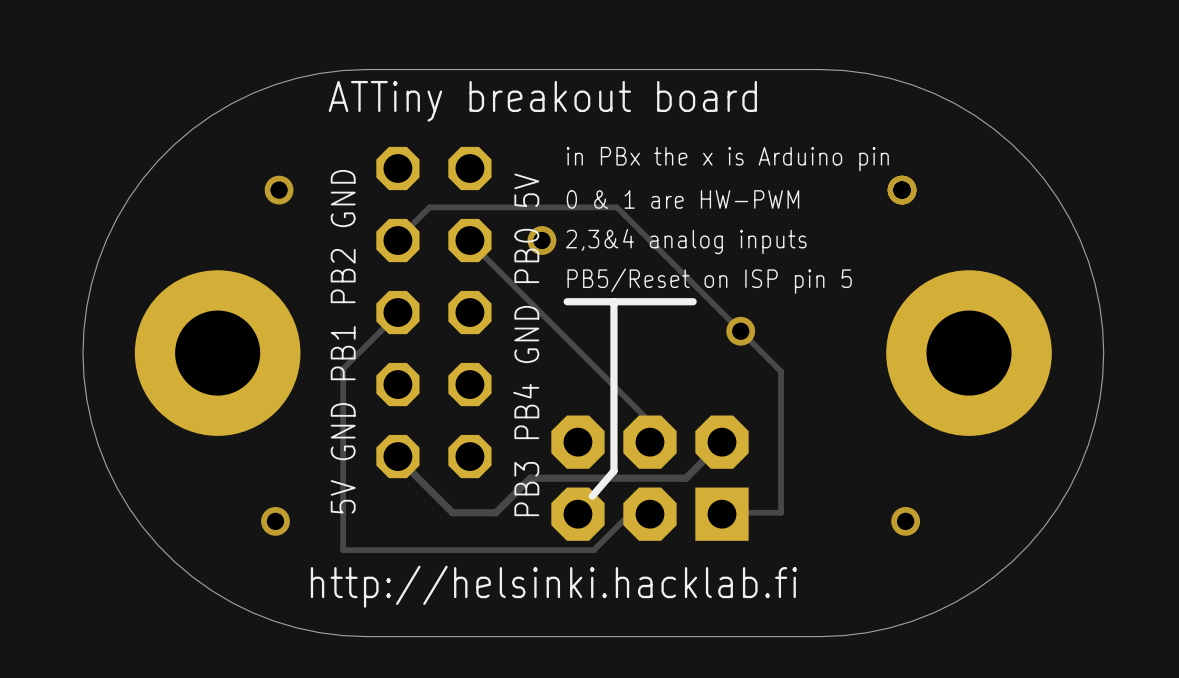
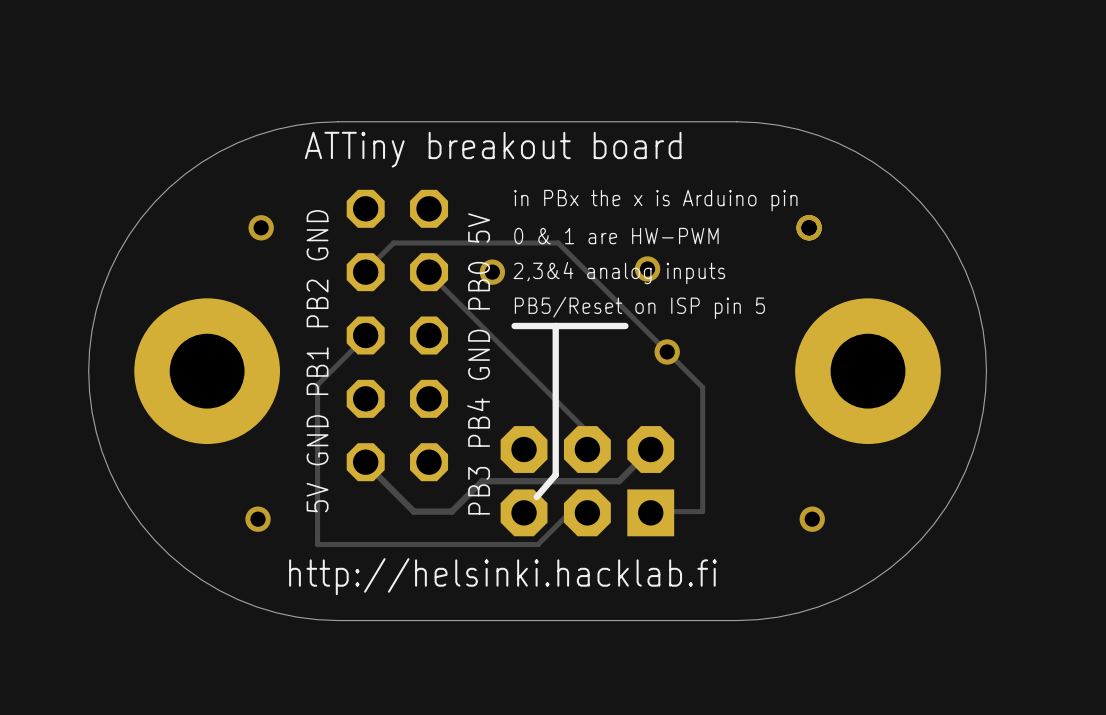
via: none -> (647, 268)

